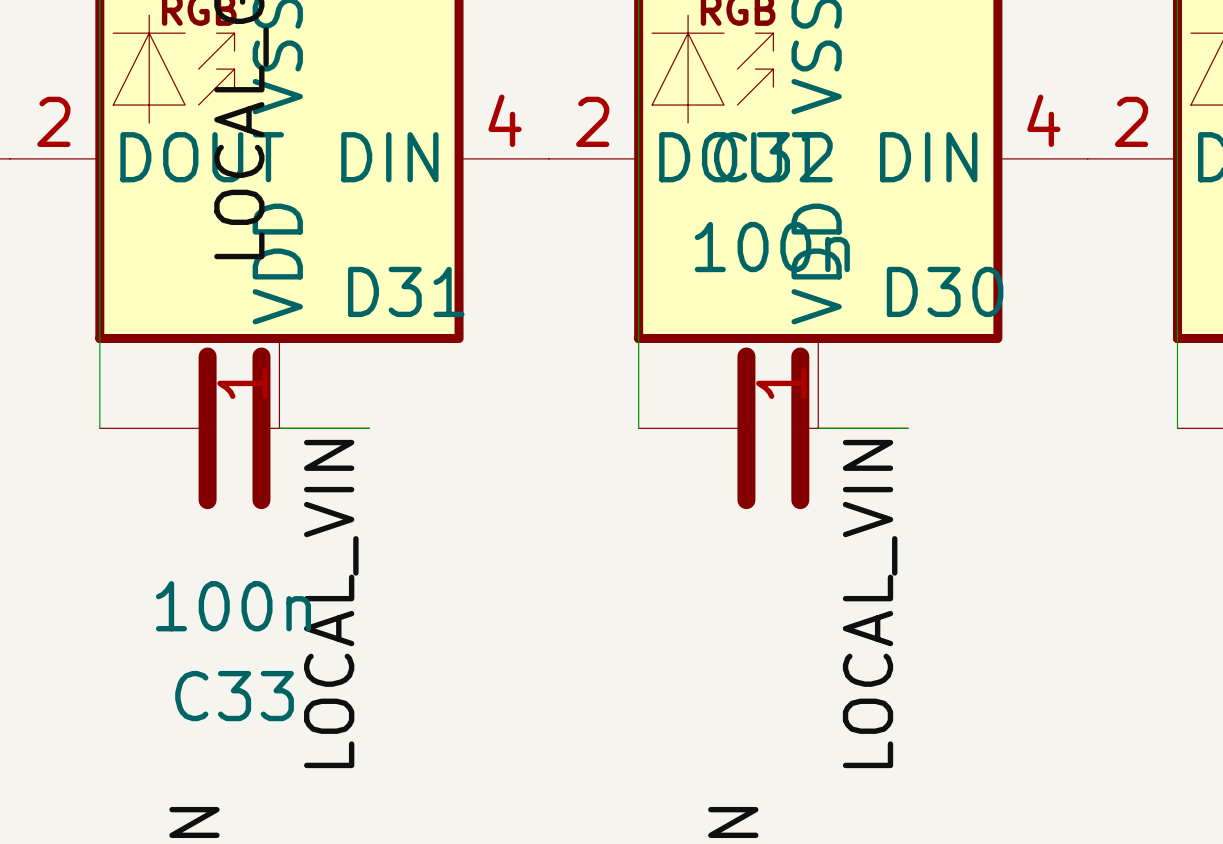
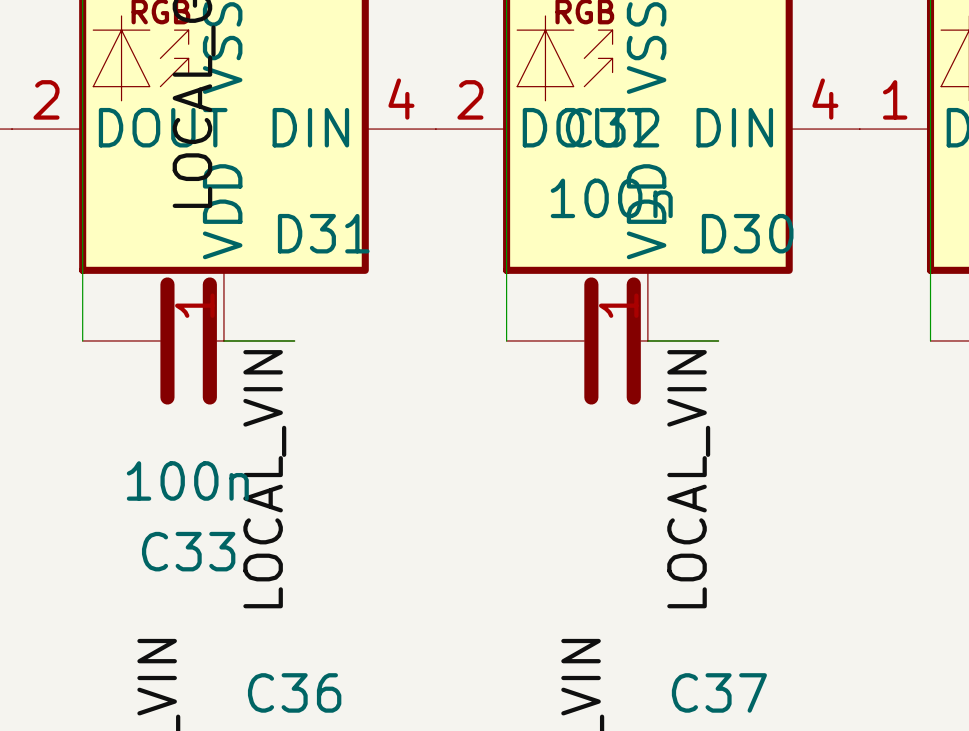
part pin number: 2 (1131, 121) -> 1 (895, 99)

